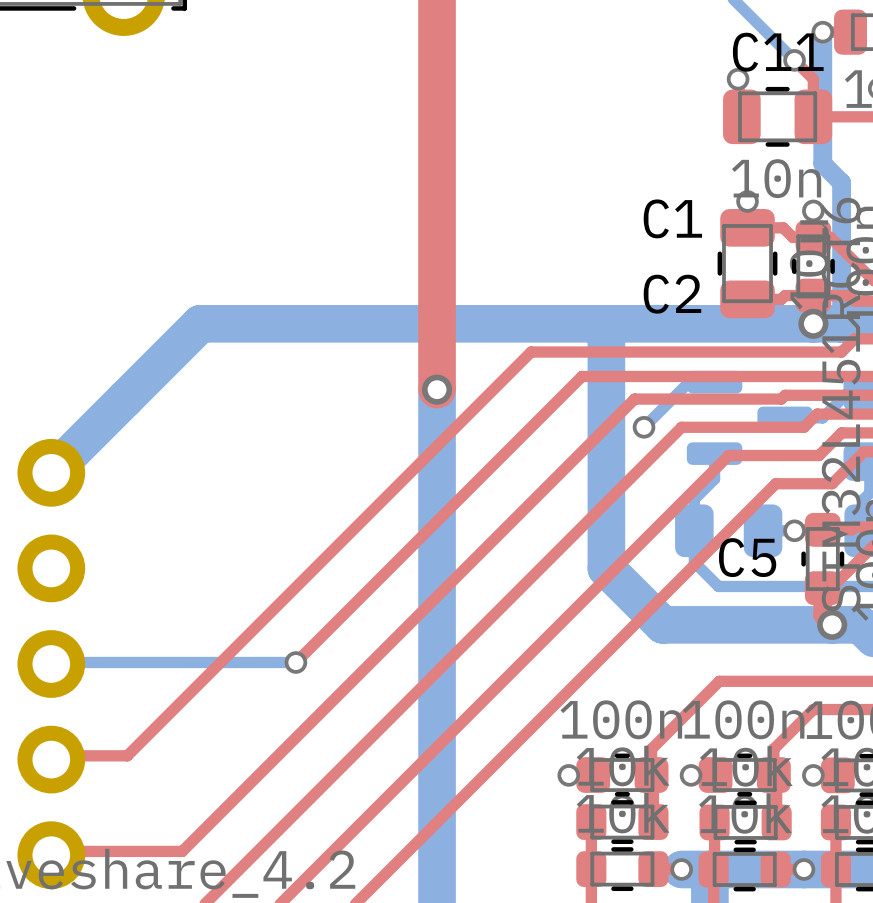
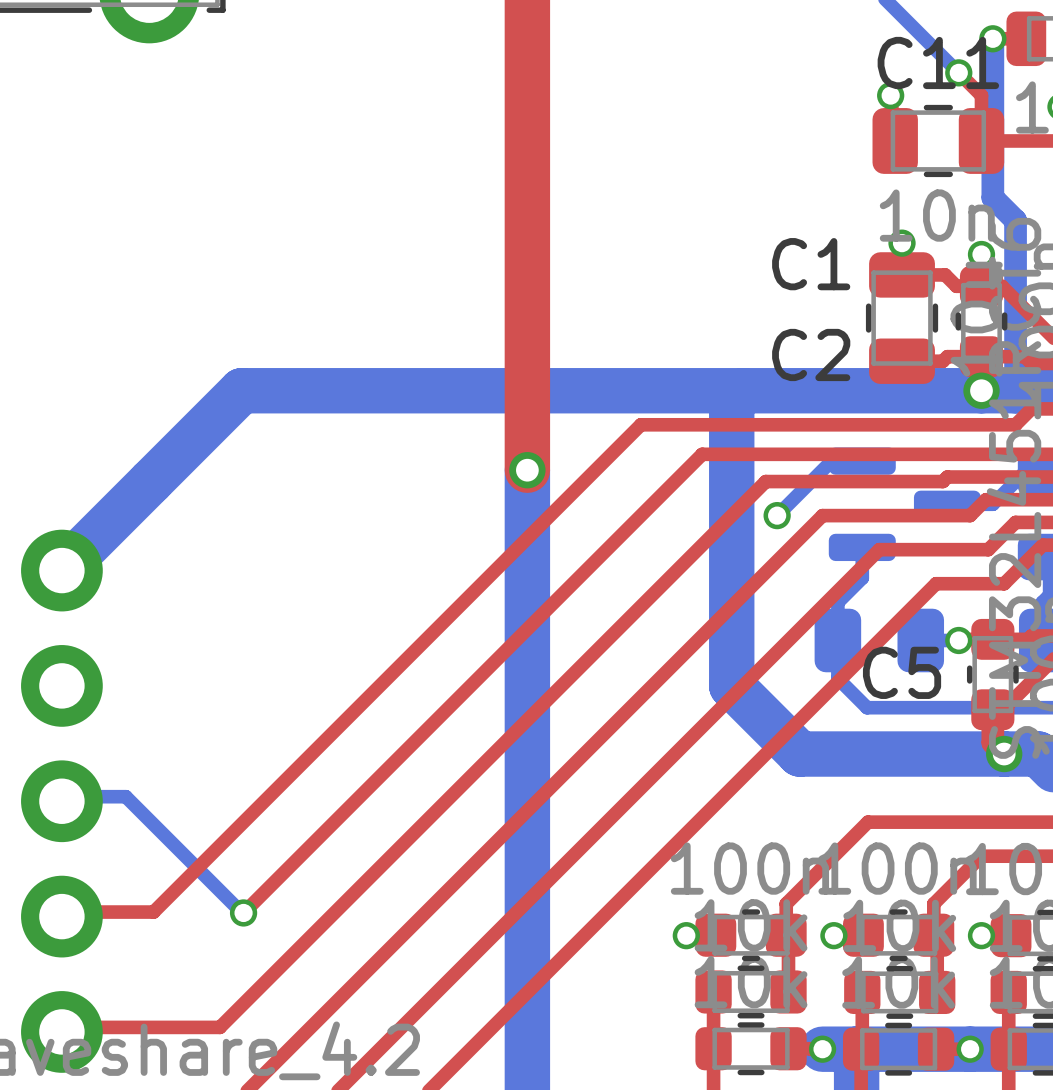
bottom track: (60, 660) (62, 662) (295, 662) -> (73, 796) (125, 796) (243, 912)
top track: none -> (357, 799) (243, 912)
via position: (295, 662) -> (243, 912)

